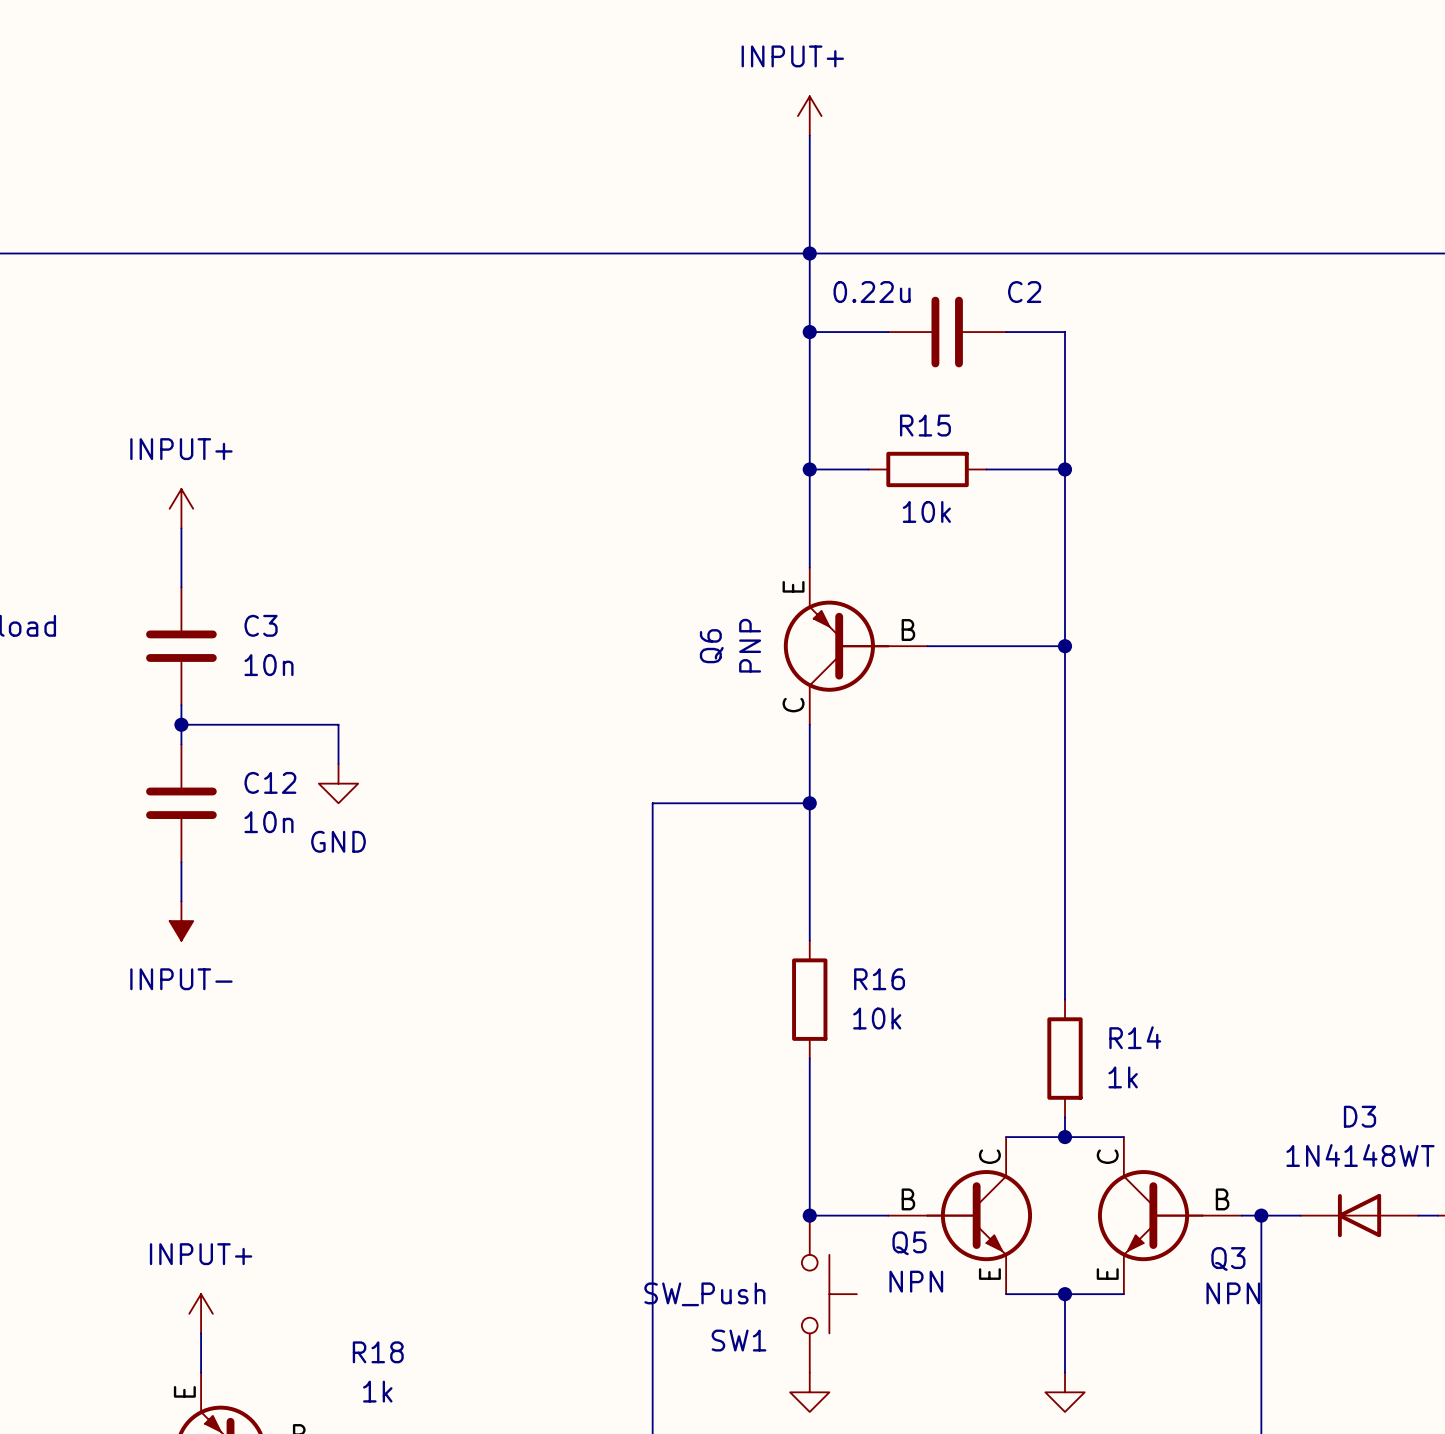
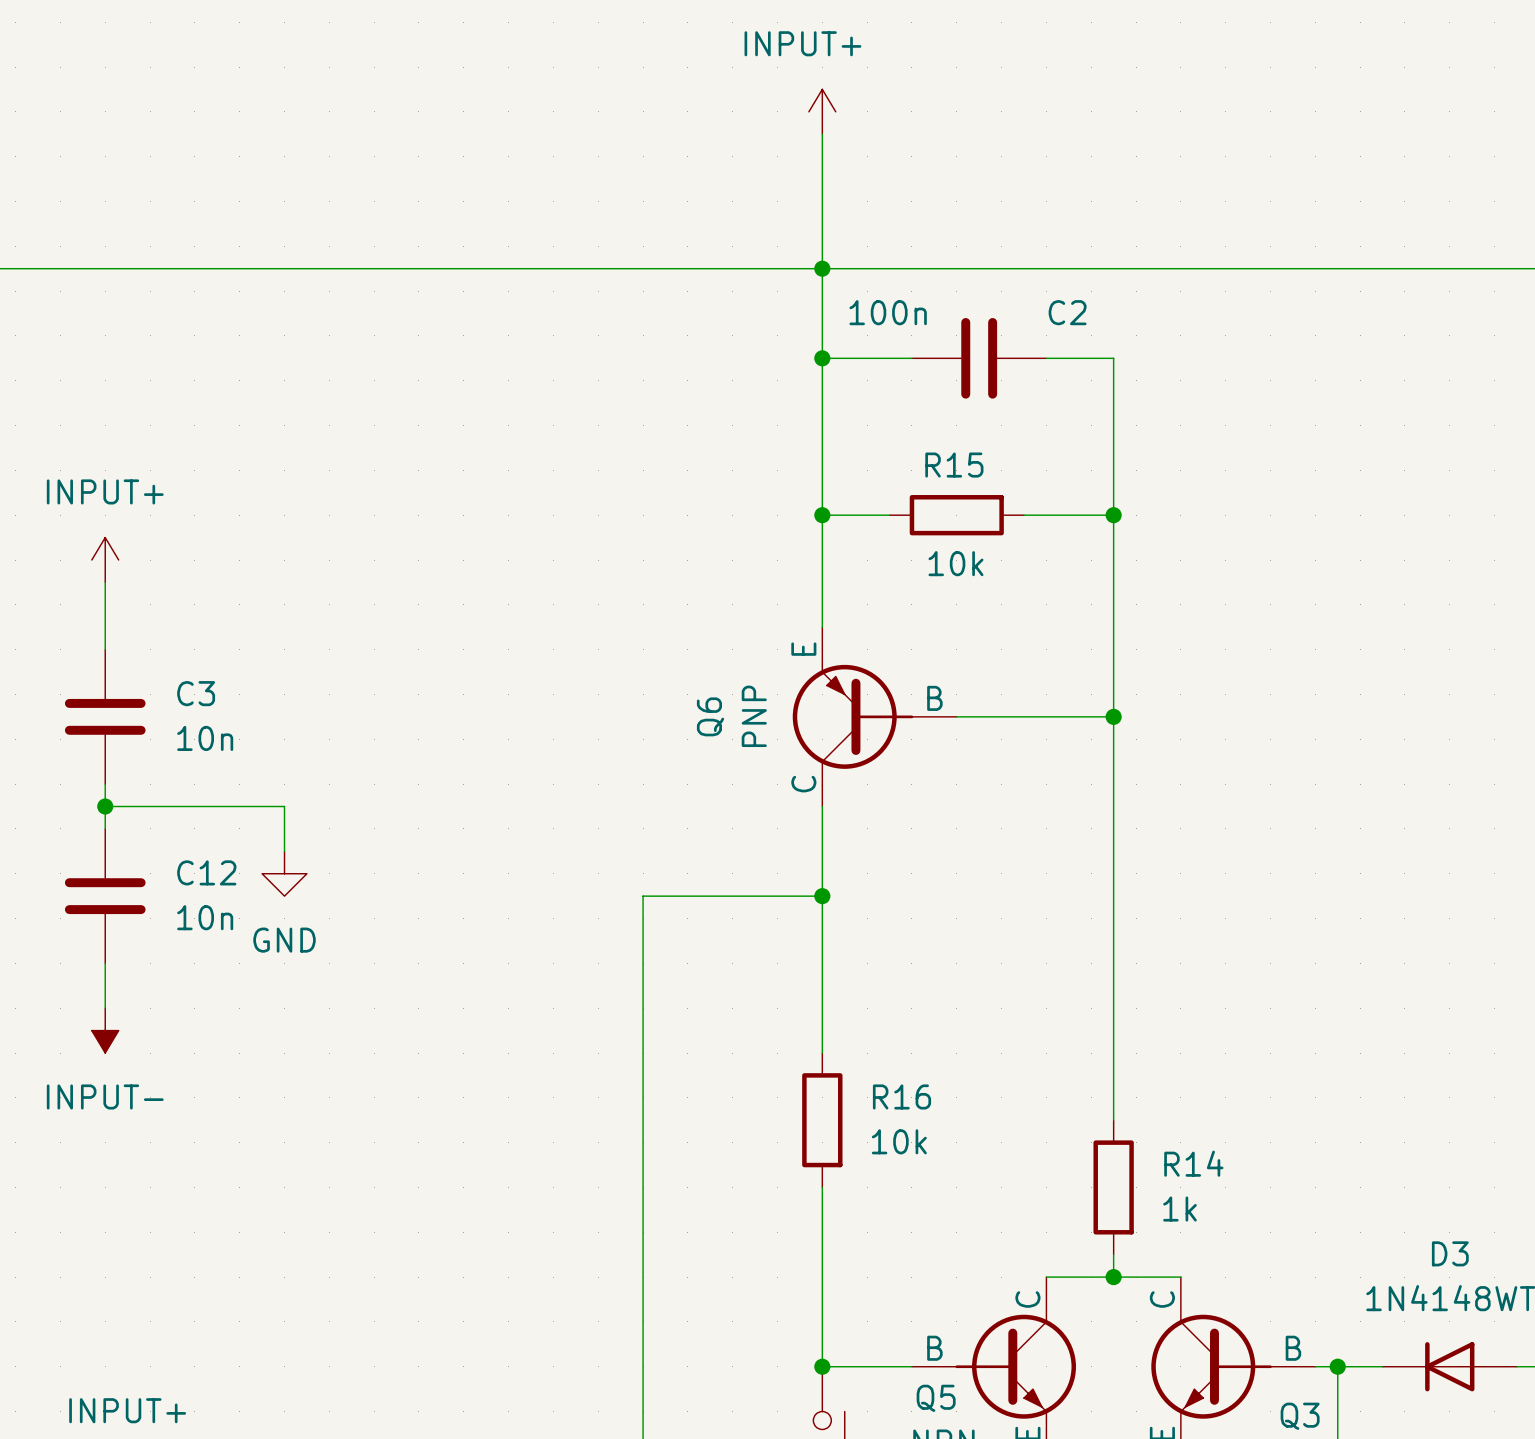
C2 value: 0.22u (872, 292) -> 100n (888, 312)

